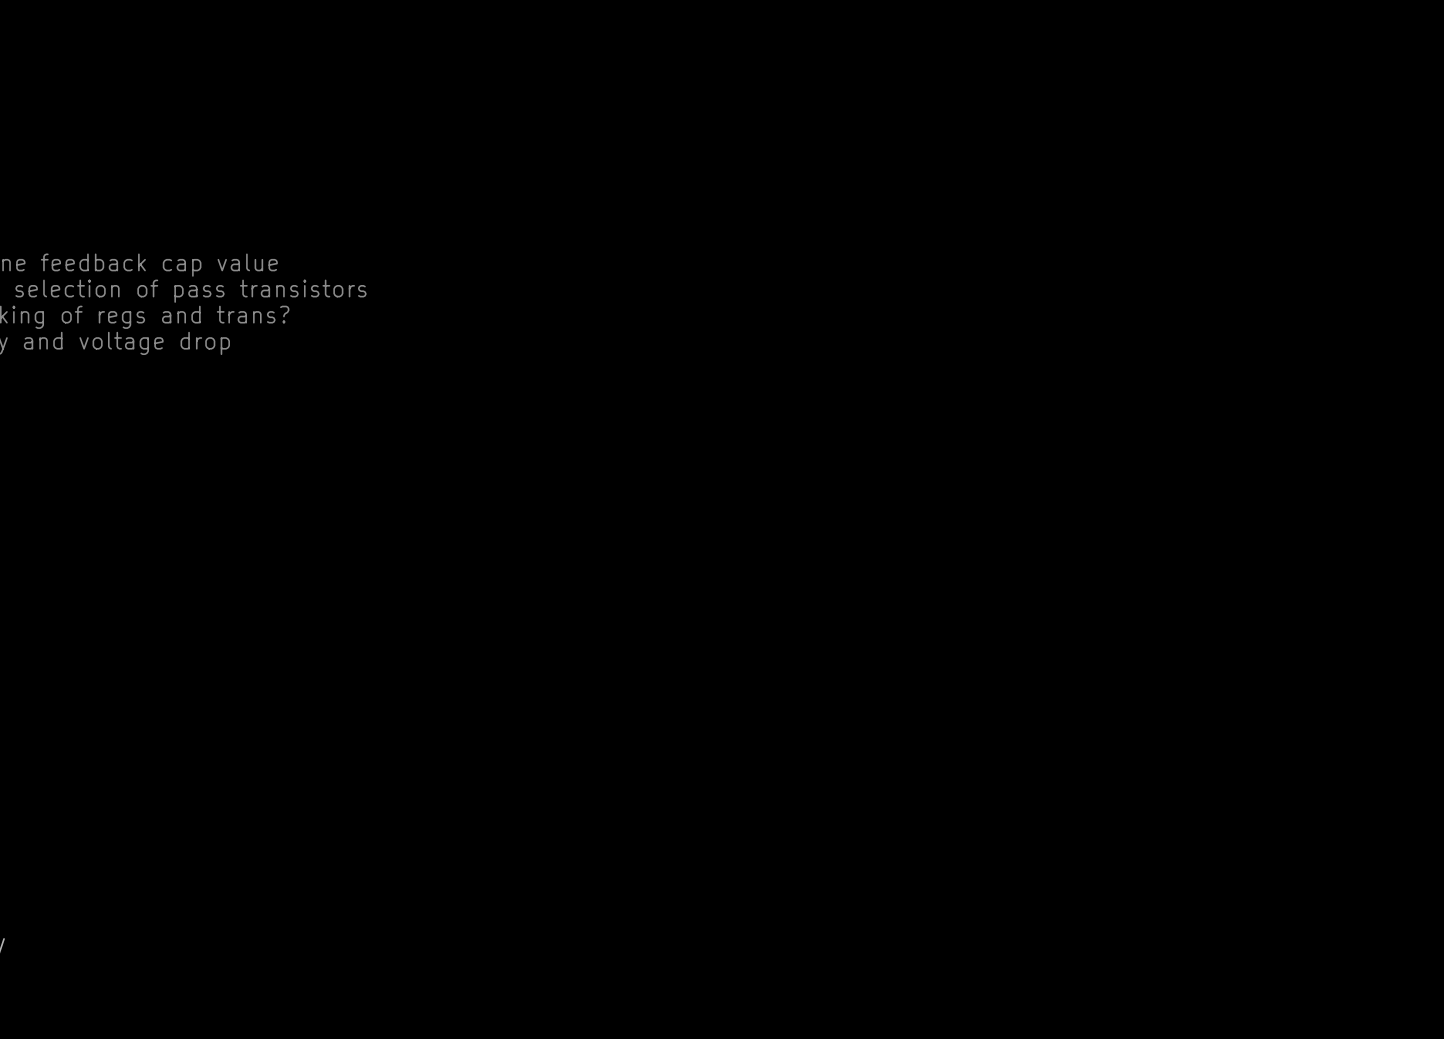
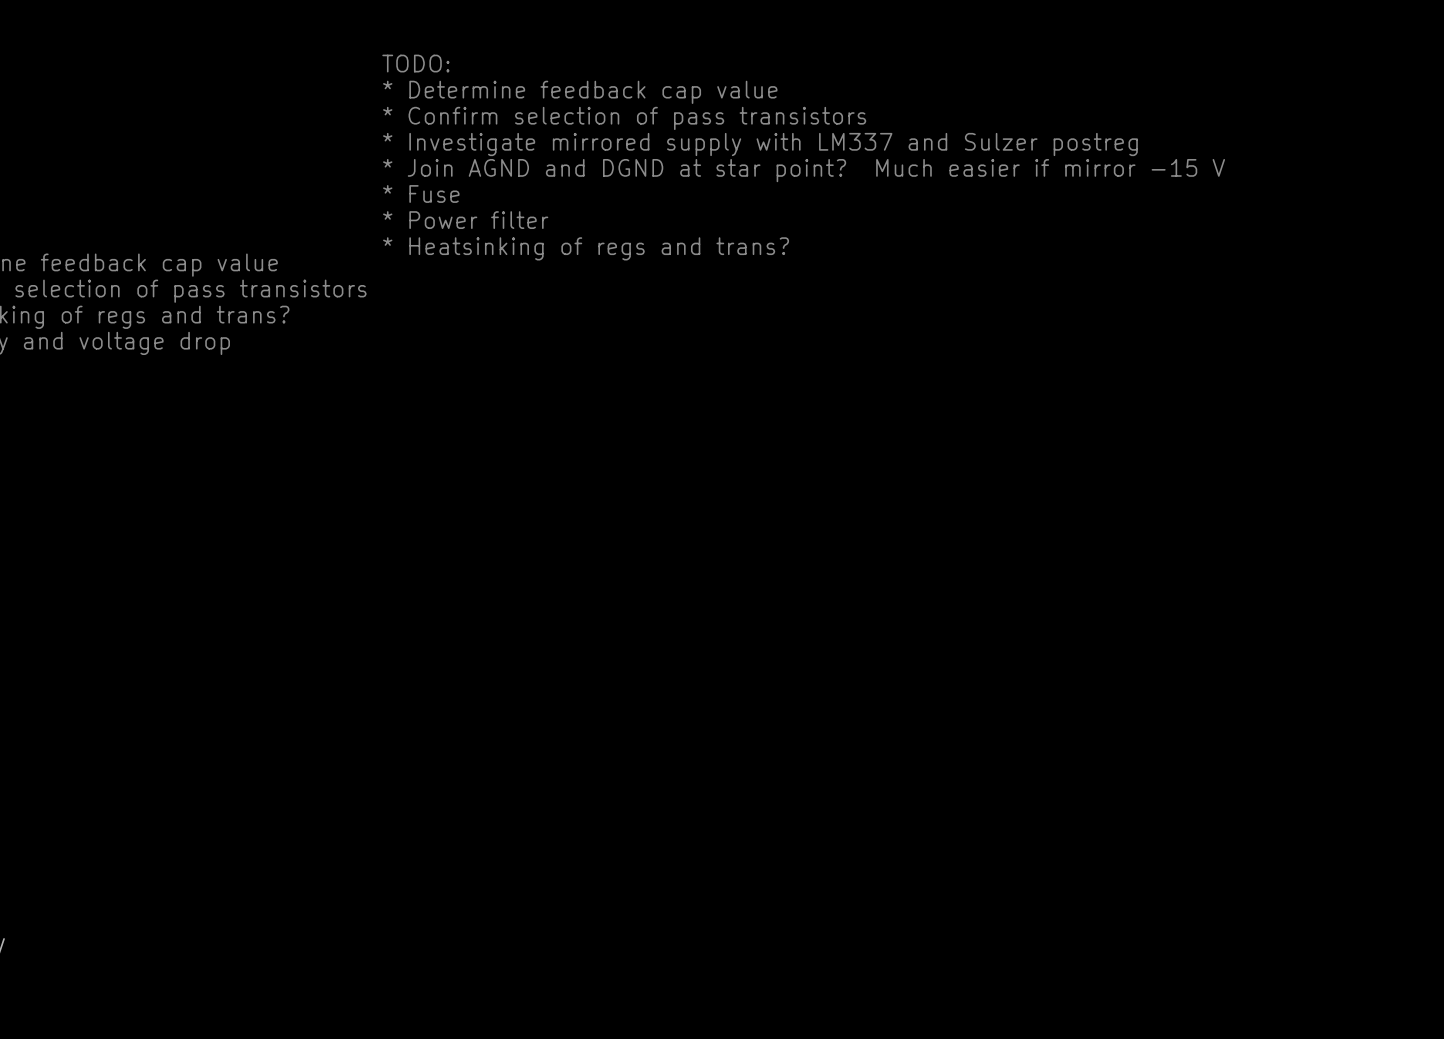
text: none -> TODO: (415, 63)
text: none -> * Determine feedback cap value (580, 92)
text: none -> * Confirm selection of pass transistors (624, 118)
text: none -> * Investigate mirrored supply with LM337 and Sulzer postreg (760, 144)
text: none -> * Join AGND and DGND at star point? Much easier if mirror -15 V (804, 170)
text: none -> * Fuse (421, 193)
text: none -> * Power filter (465, 220)
text: none -> * Heatsinking of regs and trans? (586, 248)

